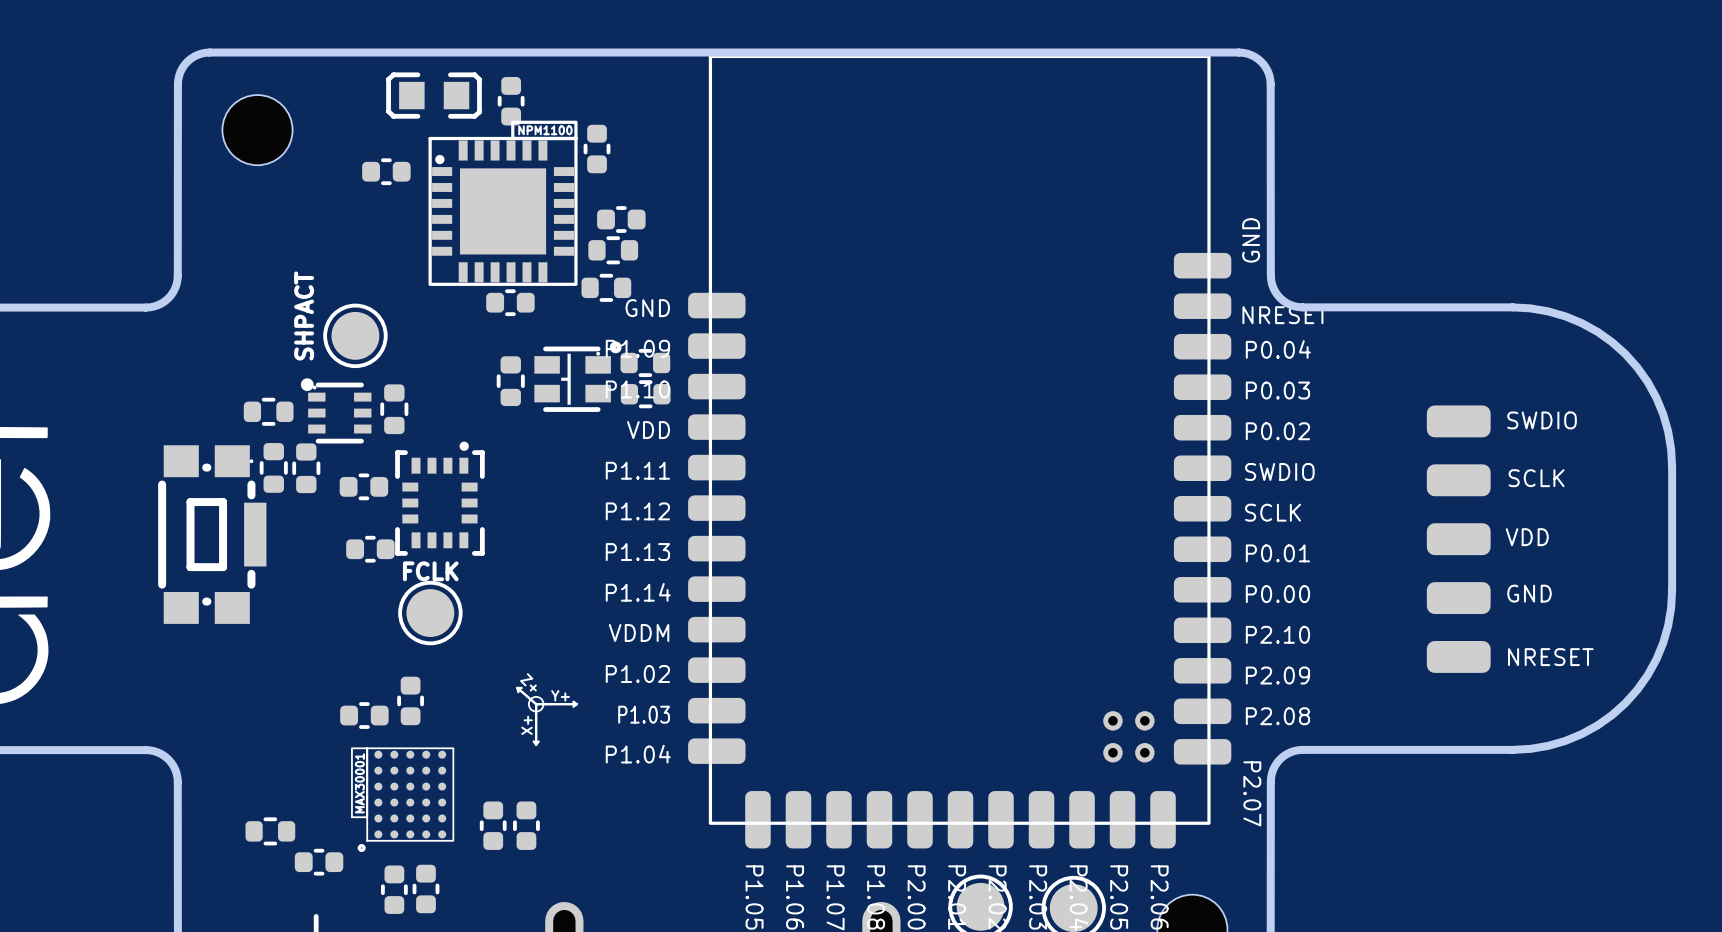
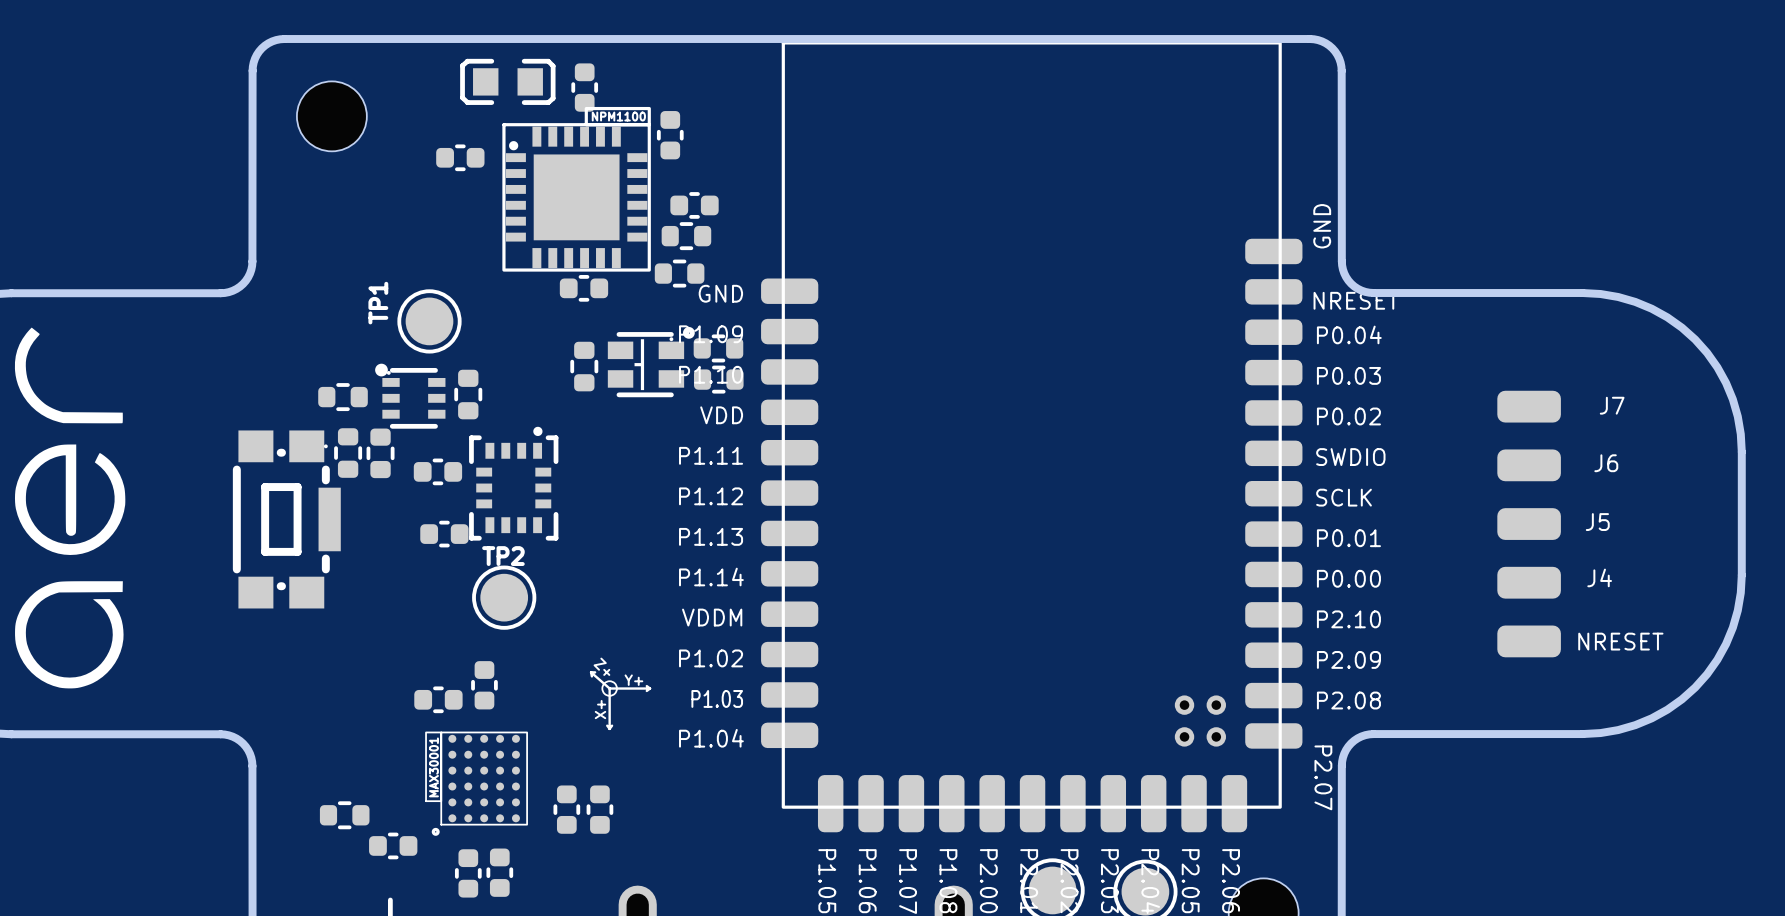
SHPACT name: SHPACT (304, 315) -> TP1 (378, 303)
SWDIO name: SWDIO (1542, 420) -> J7 (1612, 405)
SCLK name: SCLK (1536, 478) -> J6 (1606, 463)
VDD name: VDD (1527, 537) -> J5 (1597, 522)
FCLK name: FCLK (430, 571) -> TP2 (503, 556)
GND name: GND (1529, 593) -> J4 (1599, 577)

